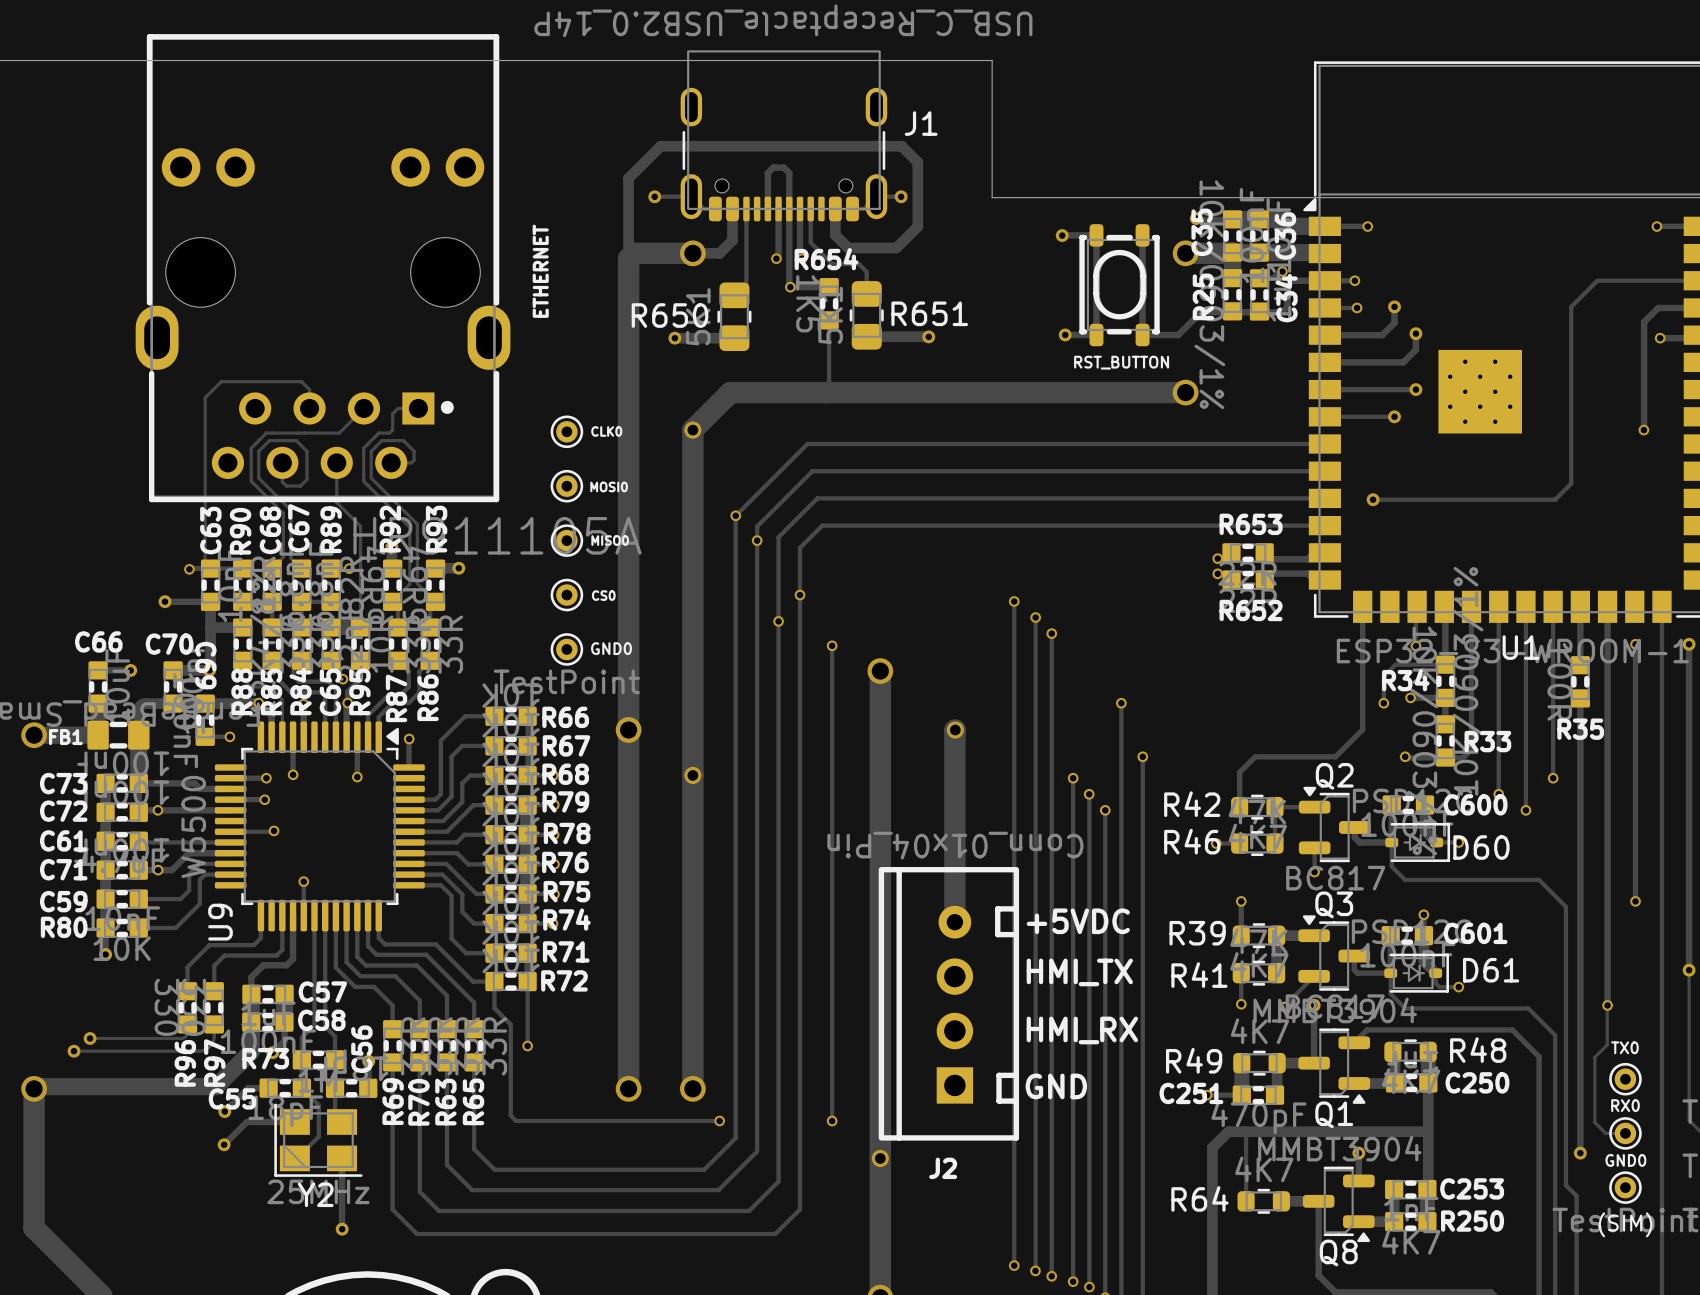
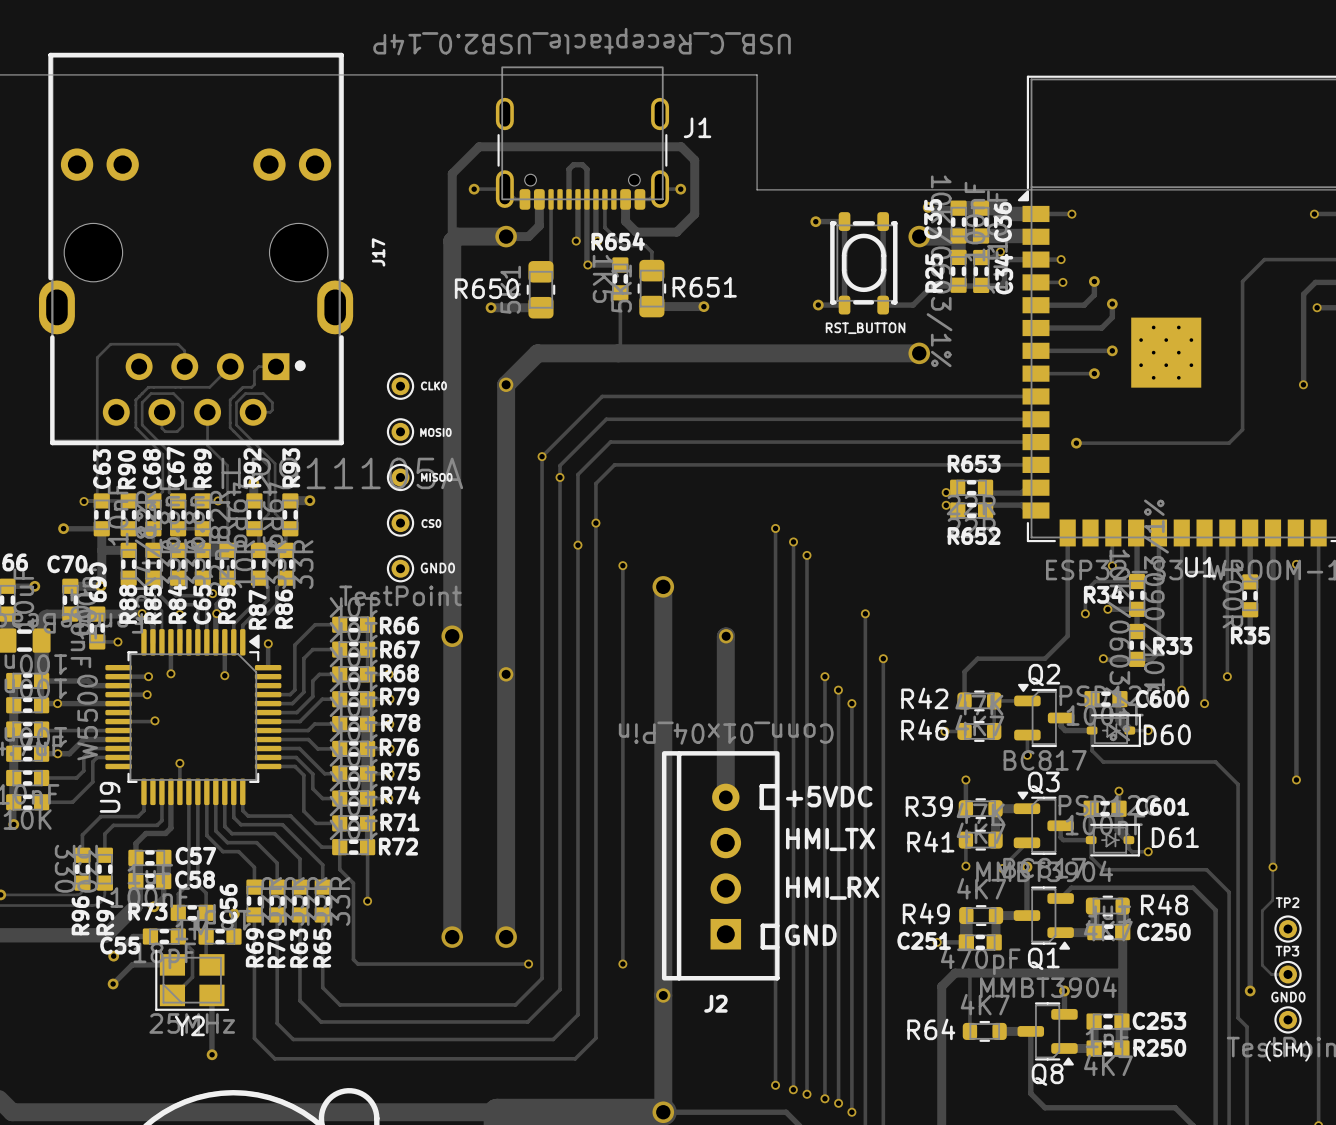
ETHERNET name: ETHERNET (540, 271) -> J17 (378, 252)
TX0 name: TX0 (1624, 1047) -> TP2 (1287, 902)
RX0 name: RX0 (1625, 1105) -> TP3 (1287, 951)

